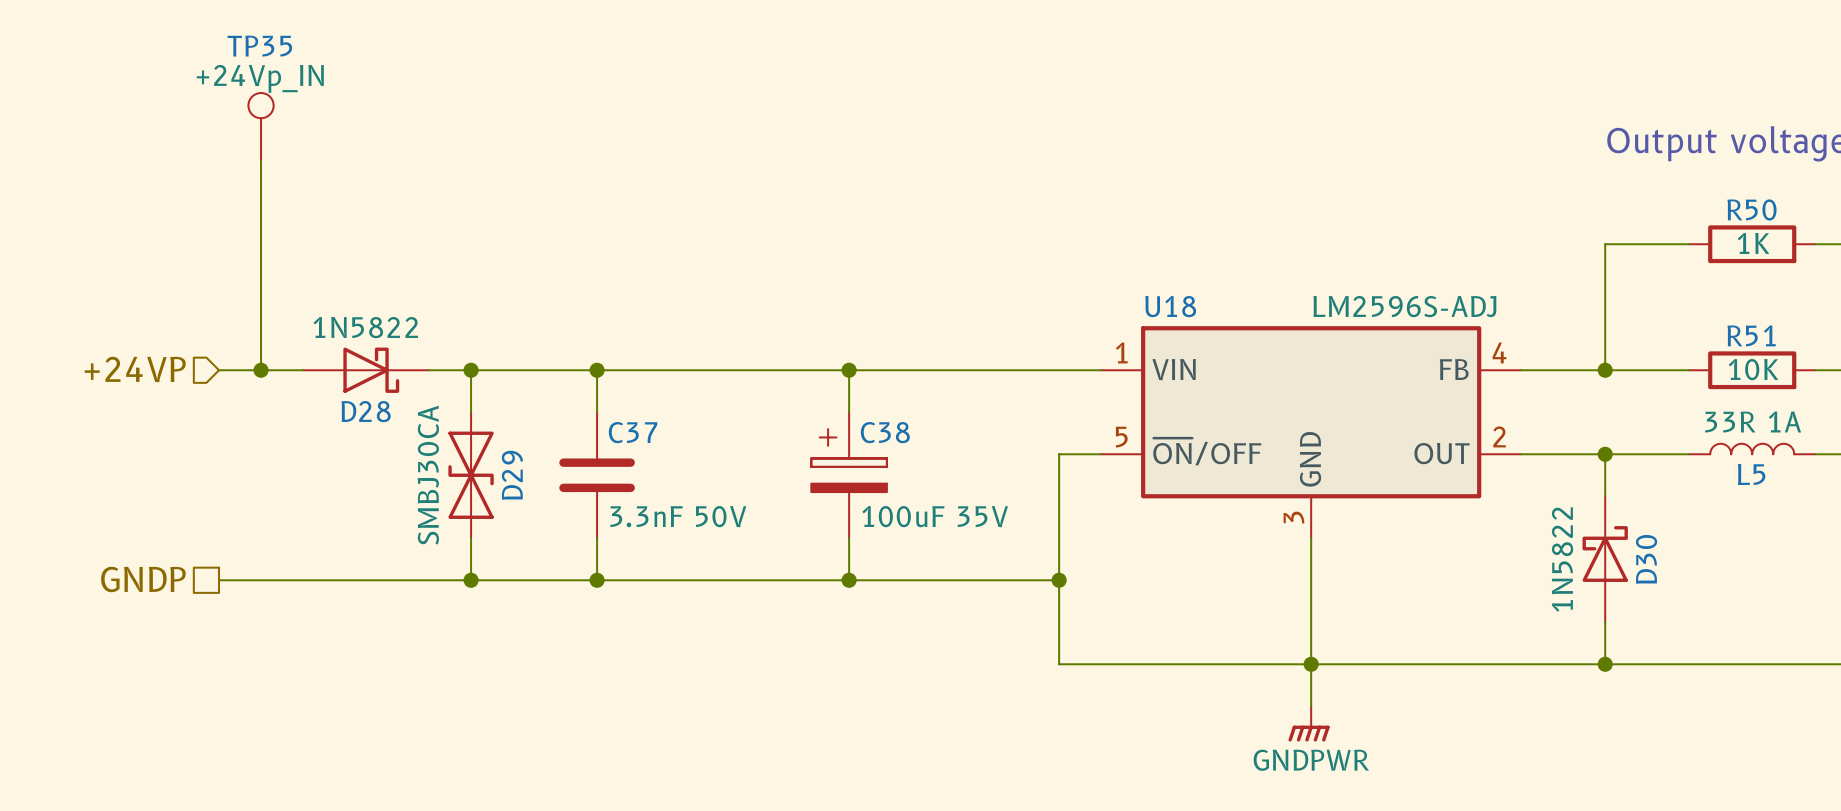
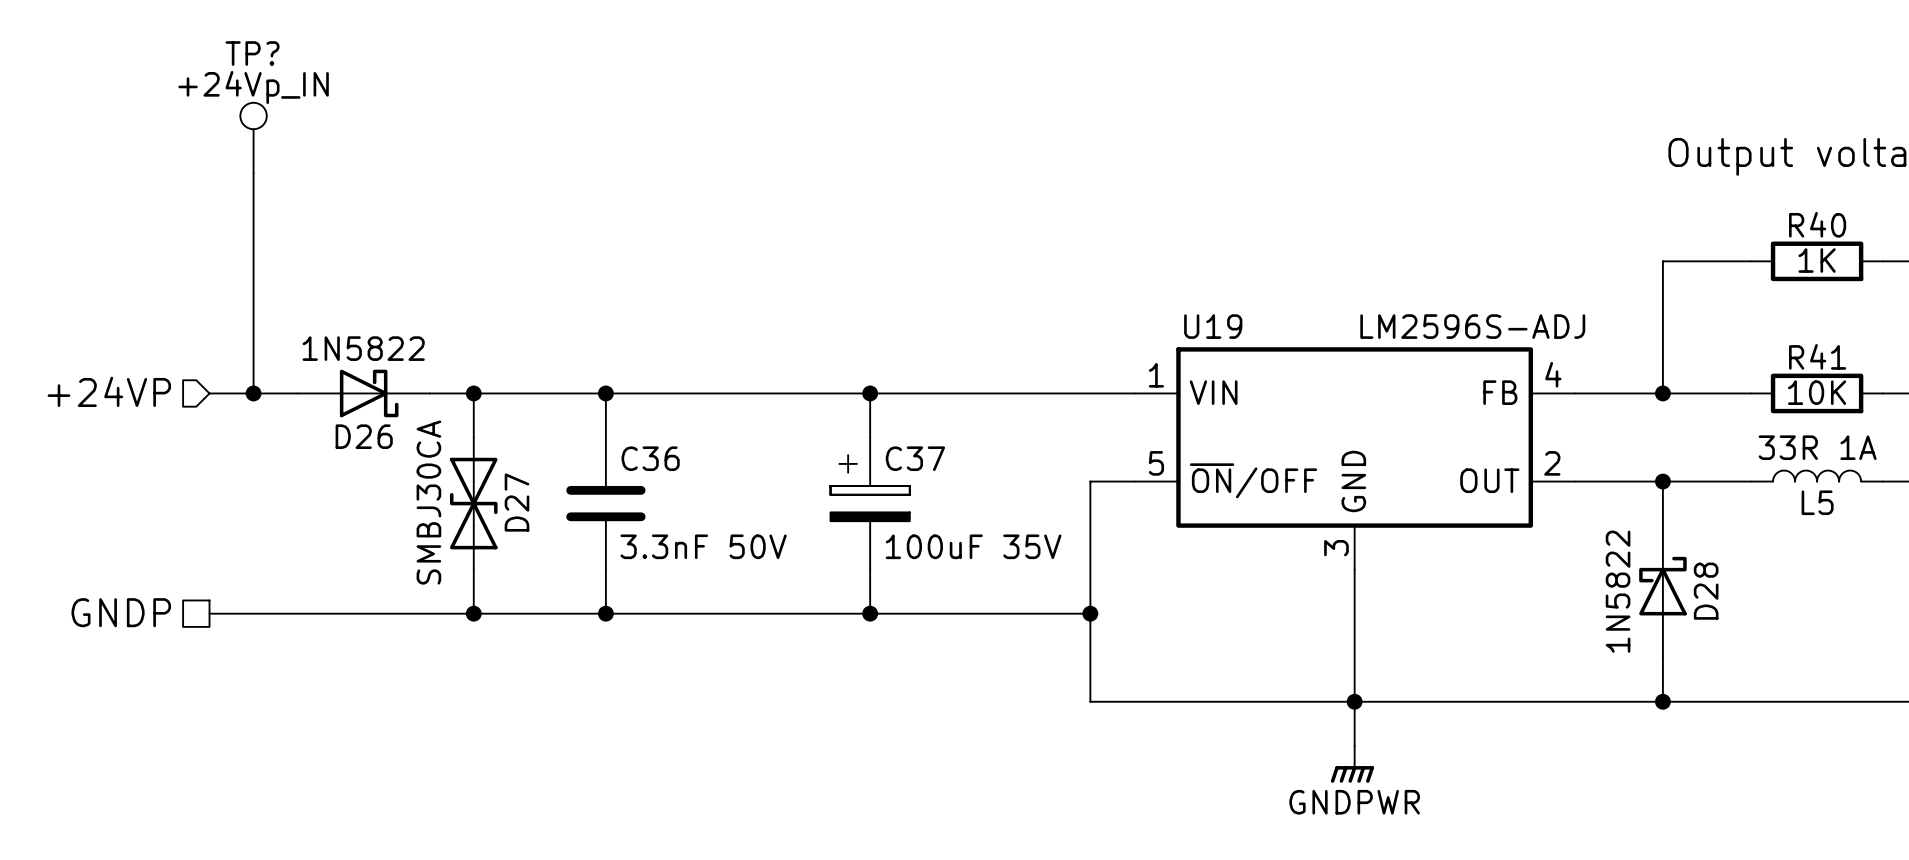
TP35 name: TP35 (259, 46) -> TP? (252, 53)
R50 name: R50 (1751, 209) -> R40 (1817, 224)
U18 name: U18 (1170, 306) -> U19 (1213, 326)
R51 name: R51 (1751, 335) -> R41 (1817, 356)
D28 name: D28 (366, 411) -> D26 (364, 436)
C37 name: C37 (633, 432) -> C36 (650, 458)
C38 name: C38 (885, 432) -> C37 (915, 458)
D29 name: D29 (512, 475) -> D27 (516, 502)
D30 name: D30 (1646, 559) -> D28 (1706, 591)

